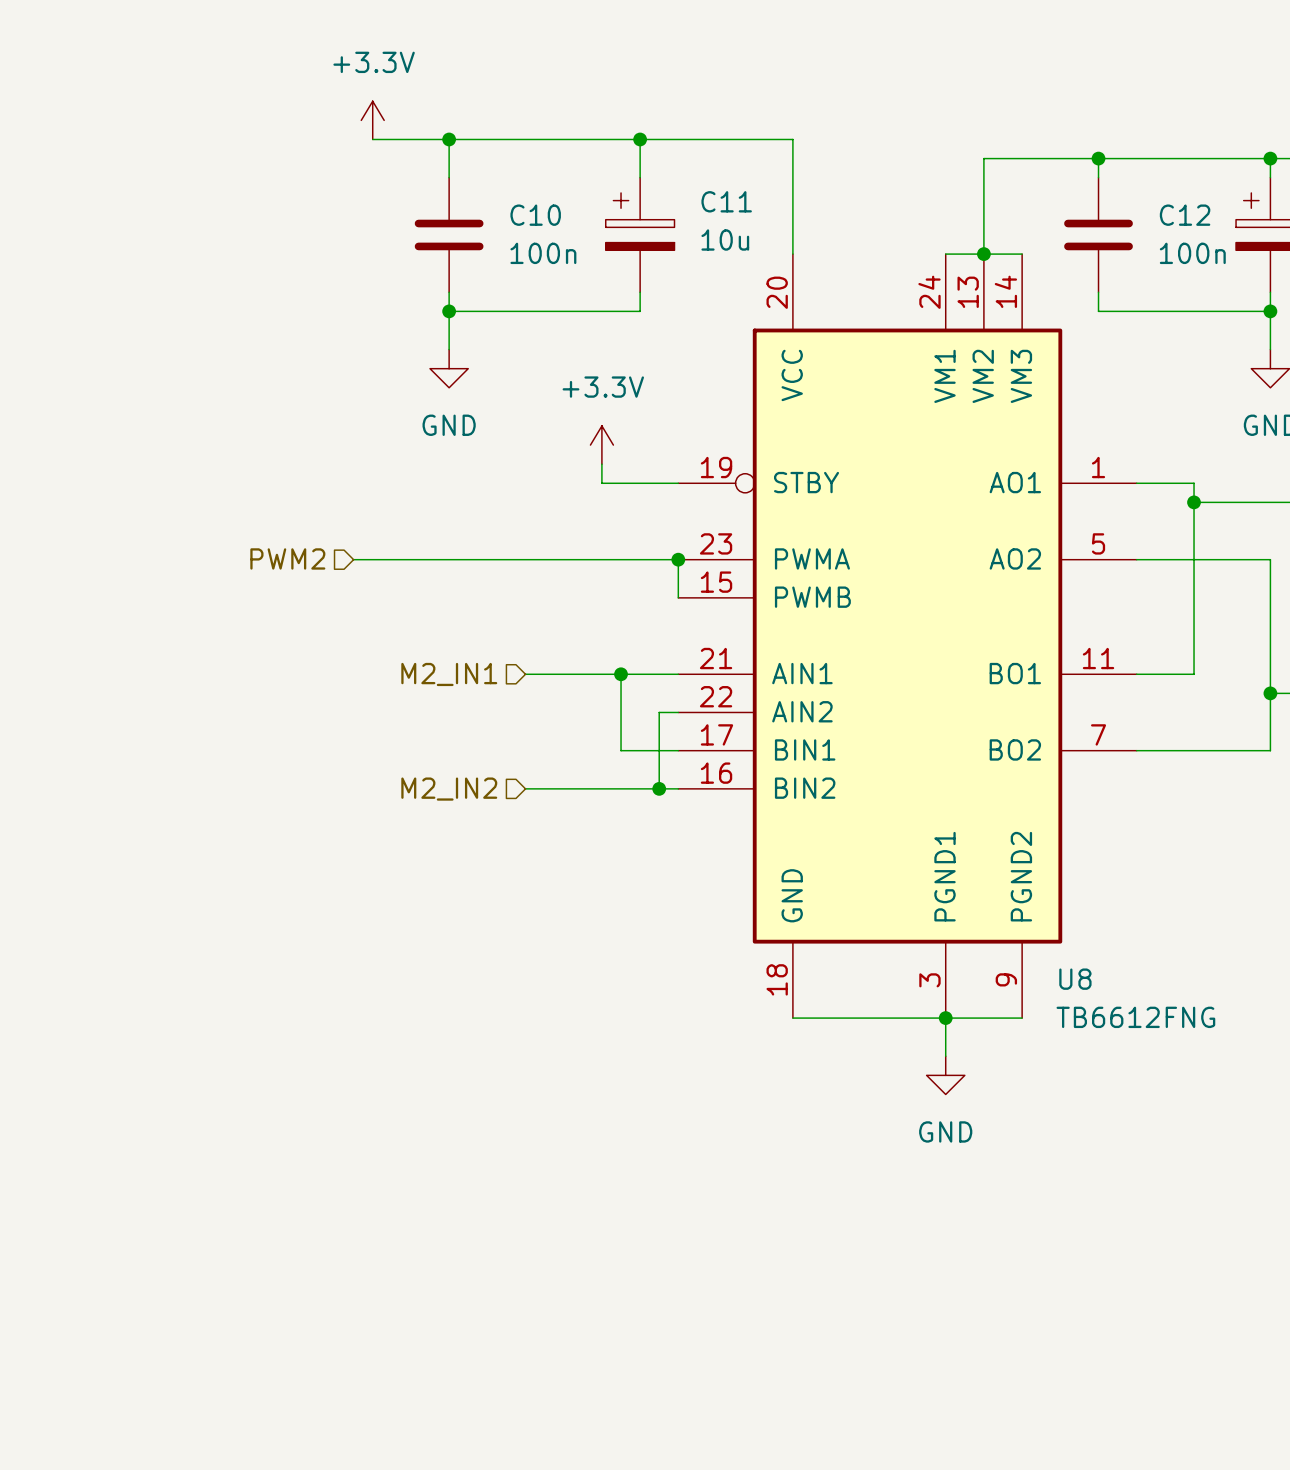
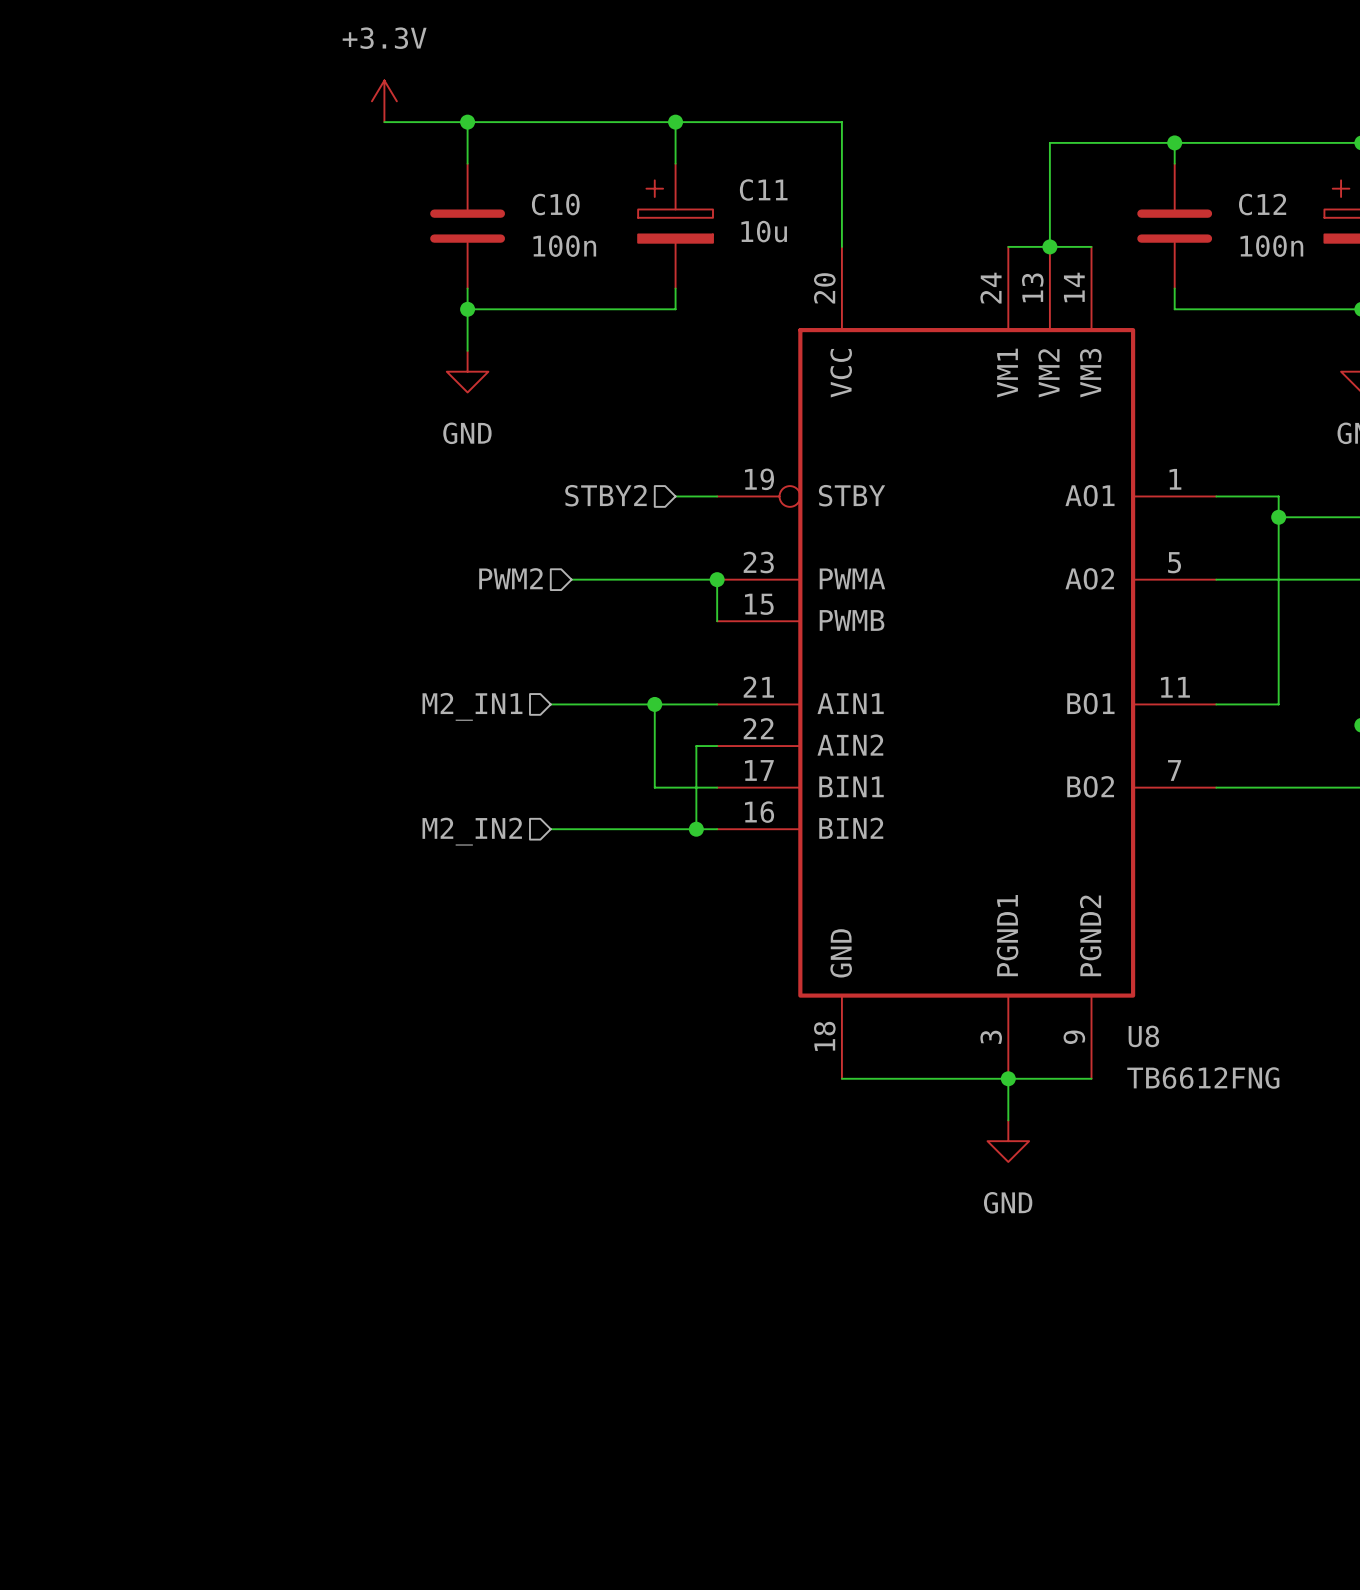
power symbol: +3.3V (601, 445) -> none
wire: (601, 464) (601, 483) (640, 483) -> none
hierarchical label: none -> STBY2 (605, 495)
hierarchical label position: PWM2 (287, 558) -> PWM2 (510, 578)
wire: (353, 559) (544, 559) -> none

